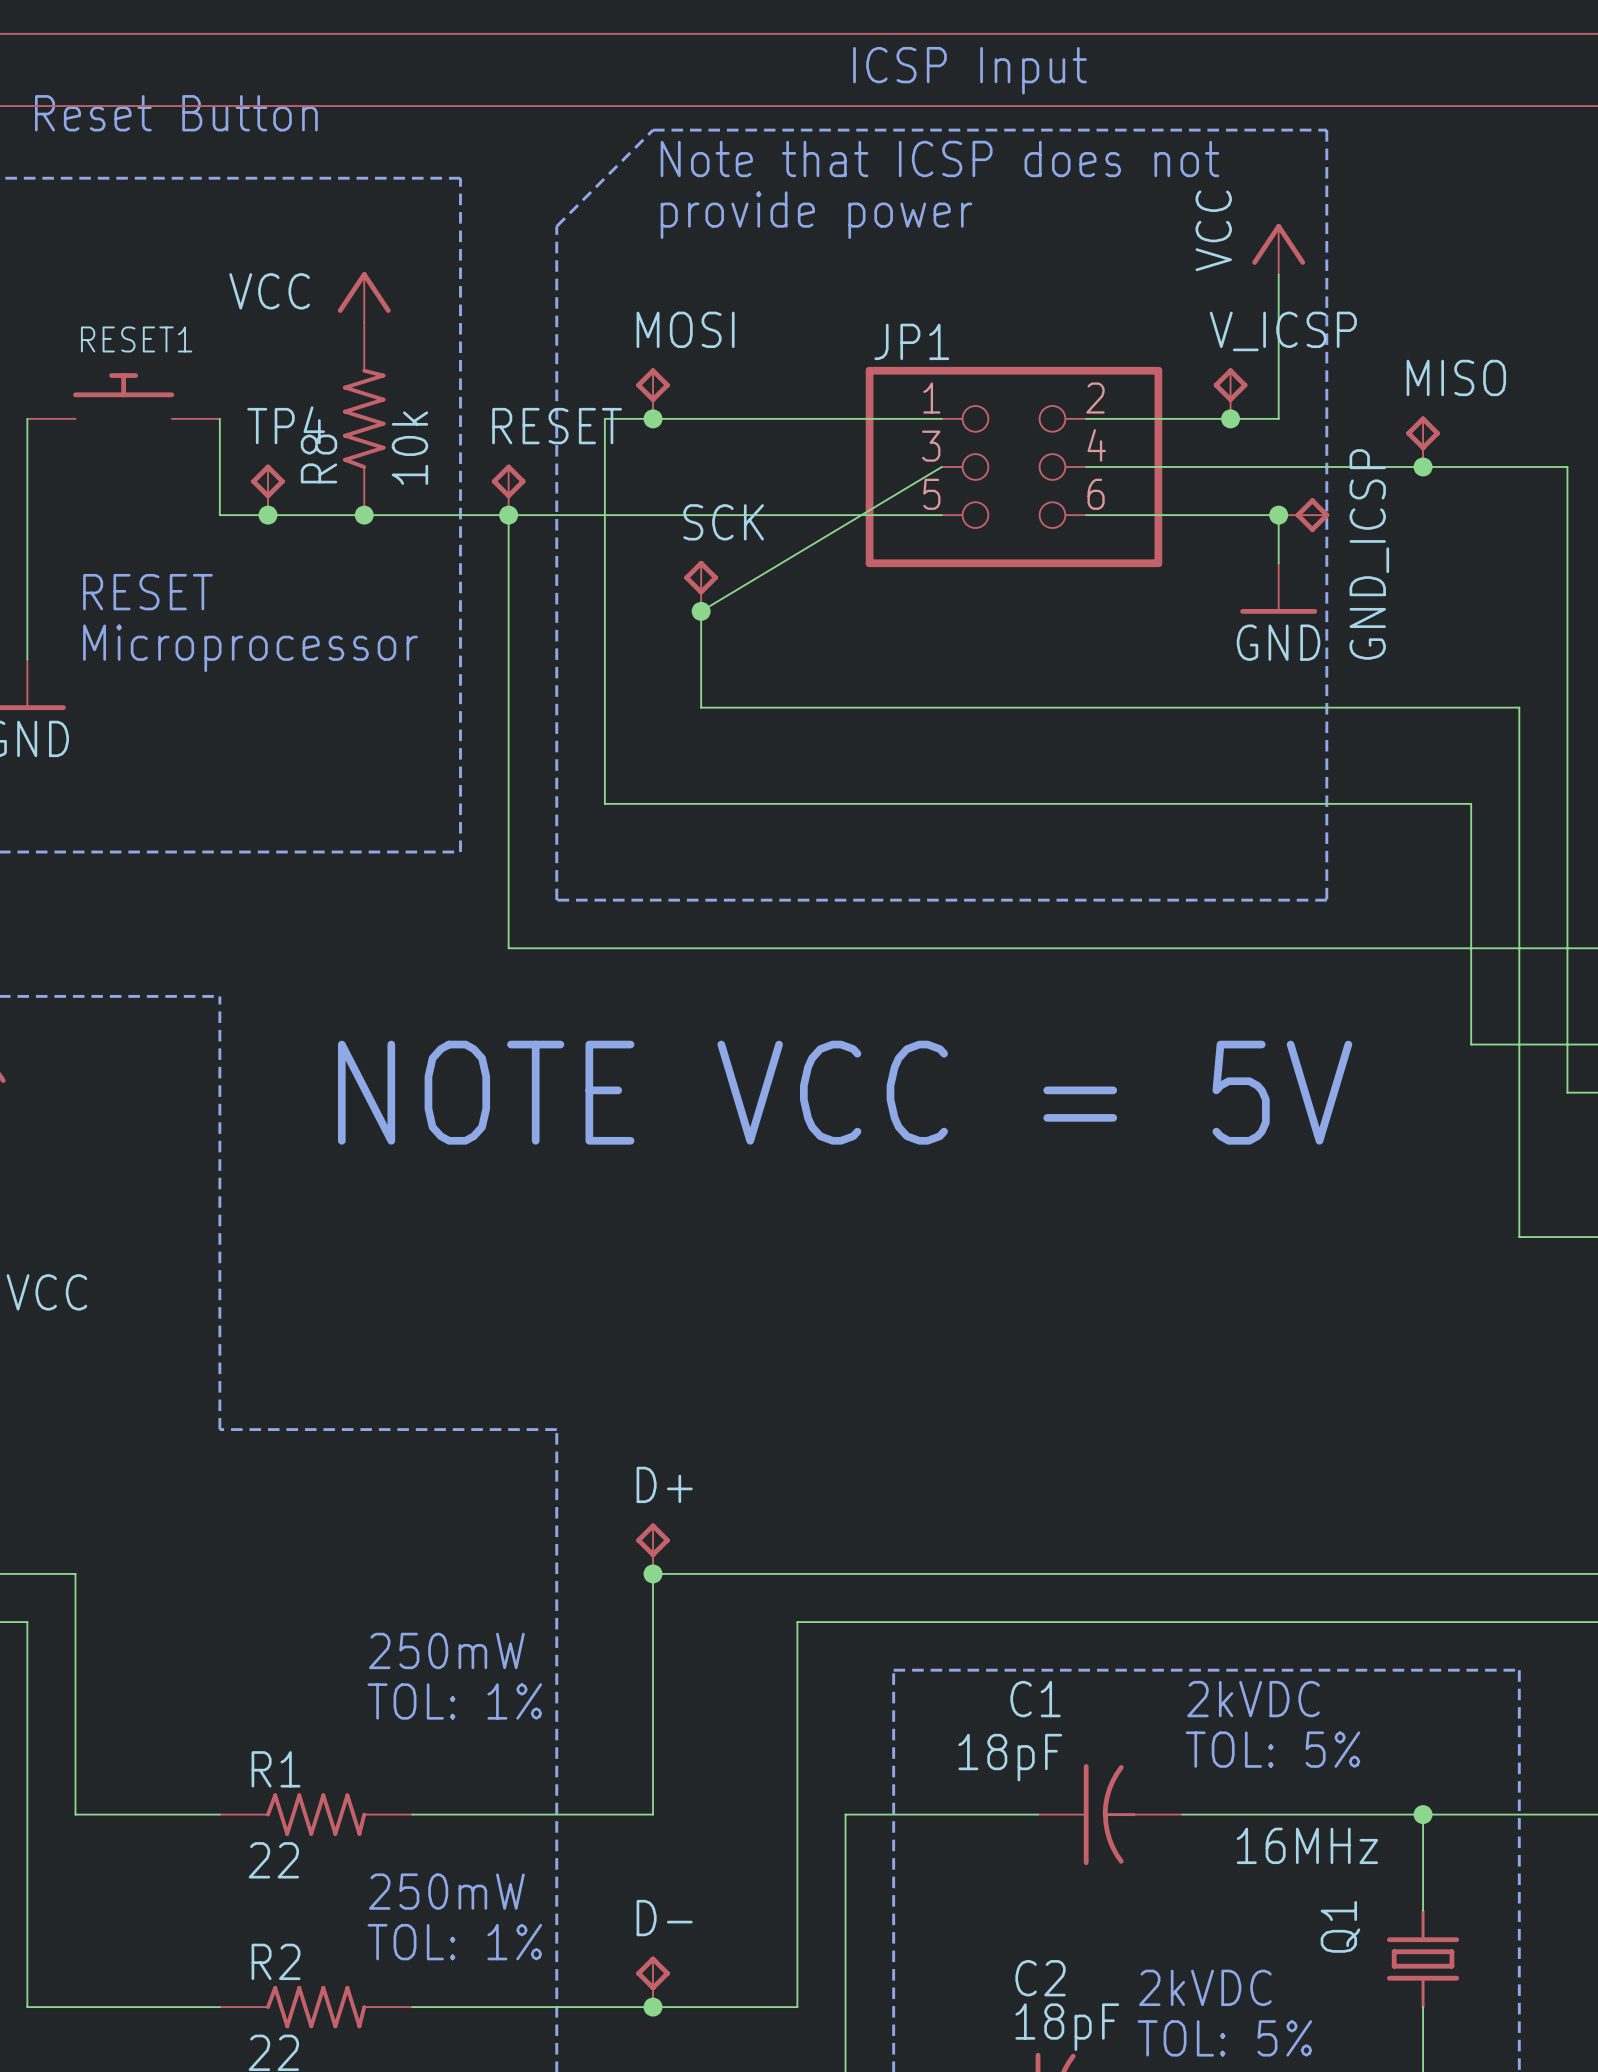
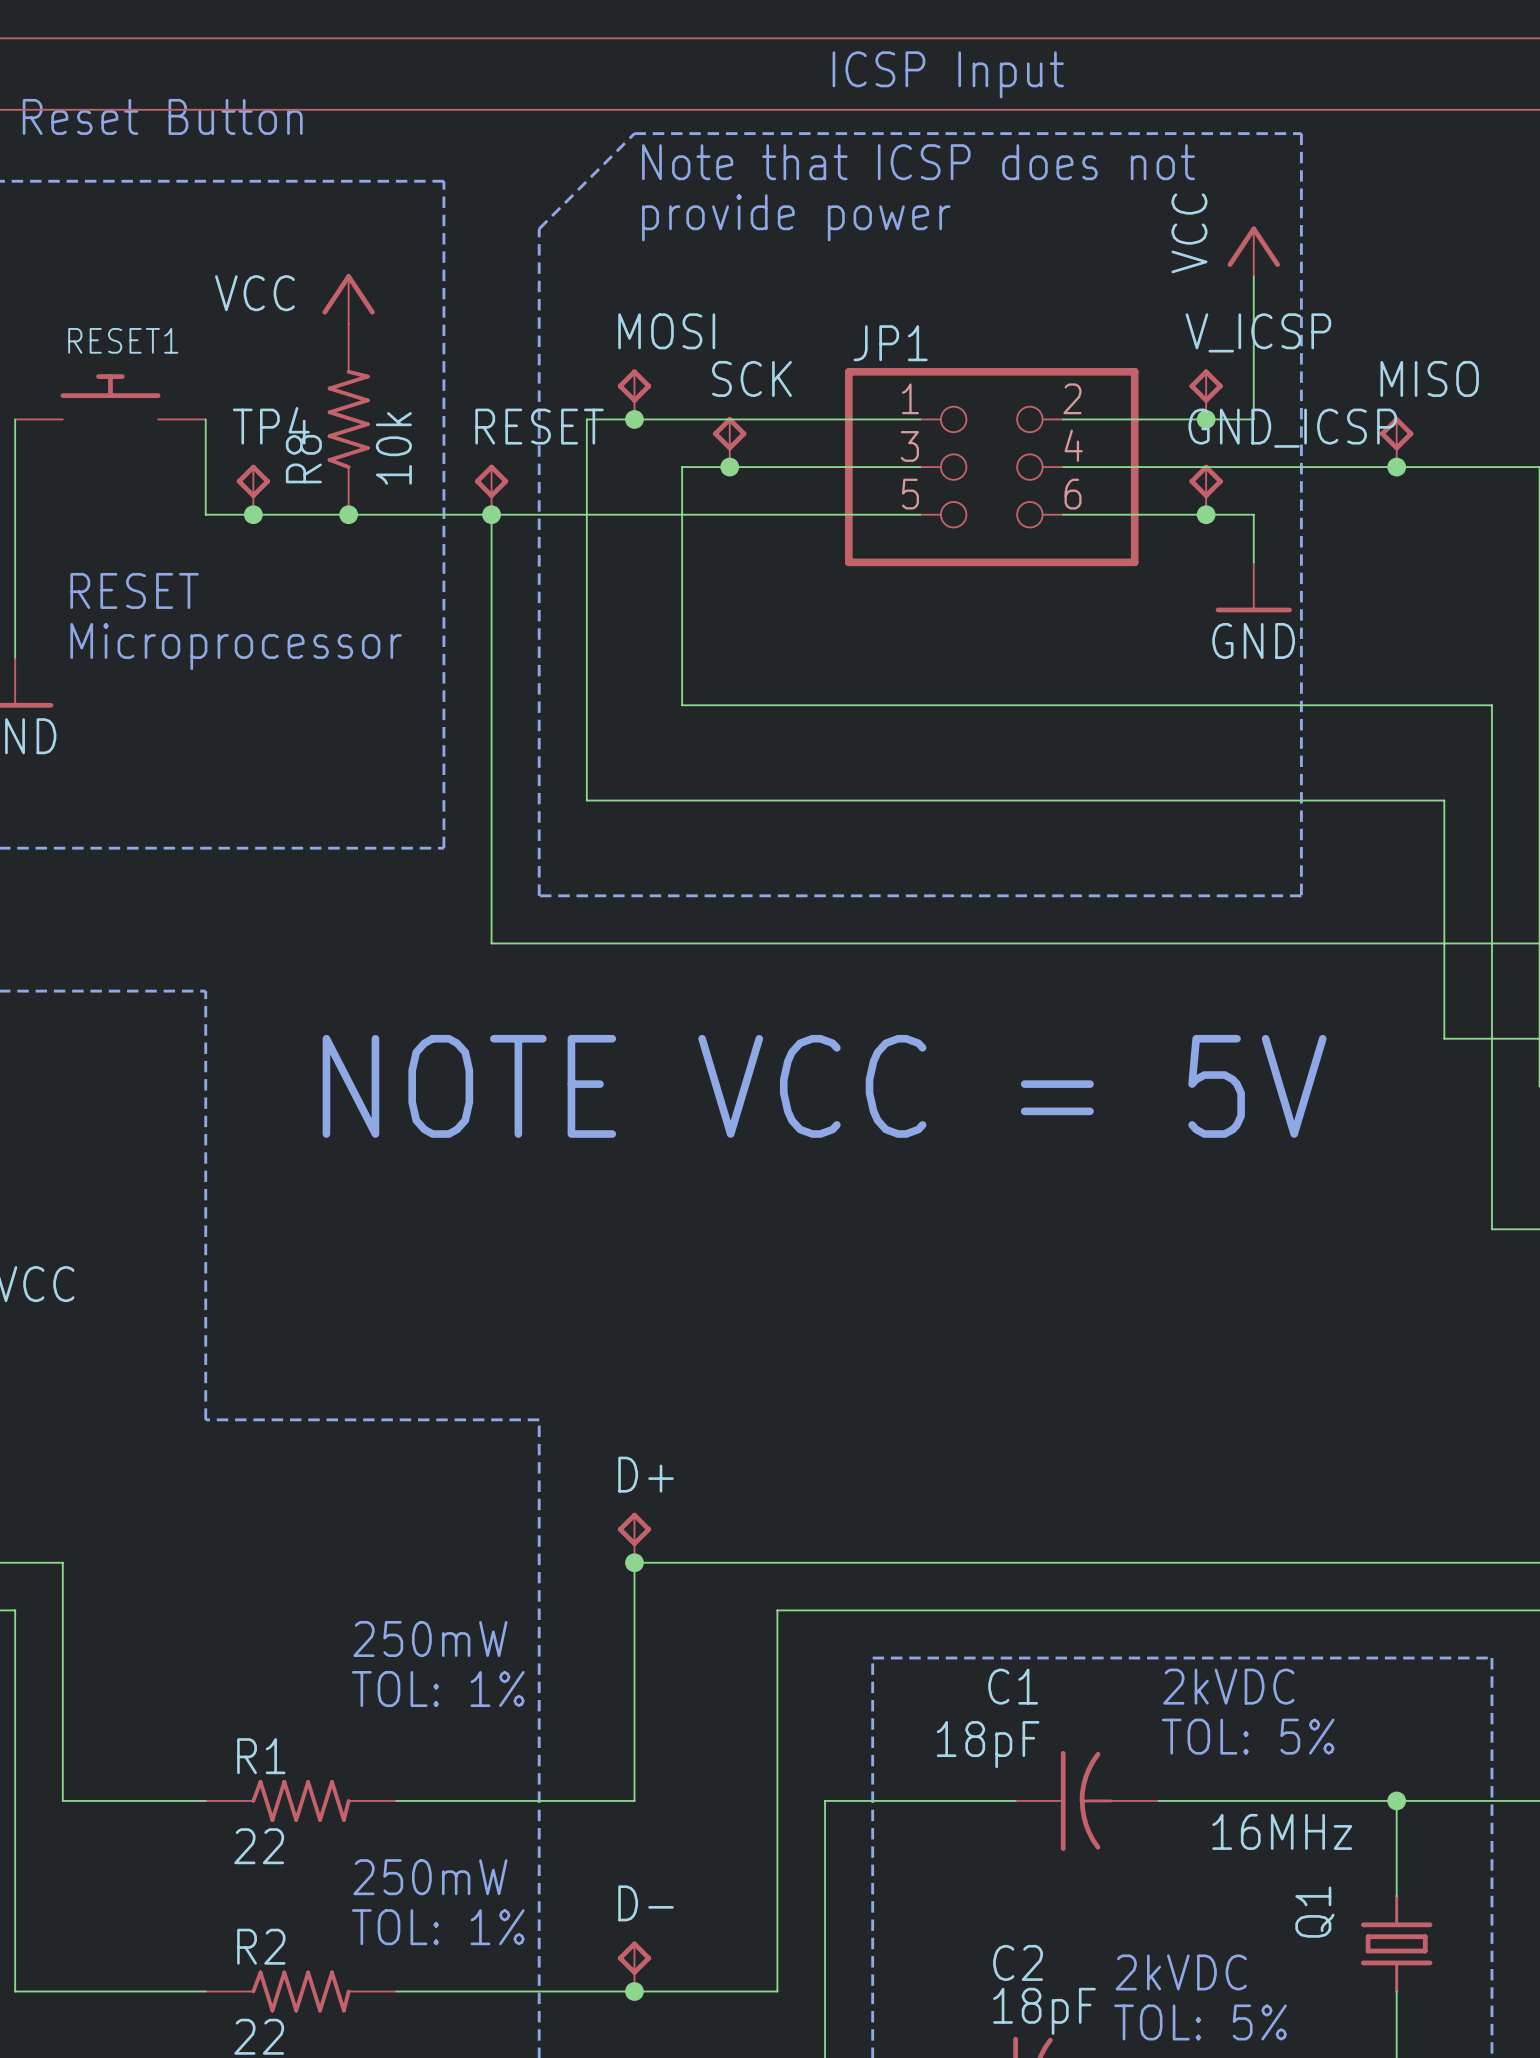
junction: none -> (729, 467)
wire: (941, 467) (701, 611) -> (920, 467) (682, 467) (682, 609)
junction position: (1278, 515) -> (1206, 514)
GND_ICSP position: (1303, 515) -> (1206, 489)
GND_ICSP rotation: 0° (1312, 515) -> 90° counterclockwise (1206, 481)
GND_ICSP name position: GND_ICSP (1369, 554) -> GND_ICSP (1292, 428)
SCK position: (701, 586) -> (729, 442)
junction: (701, 611) -> none

